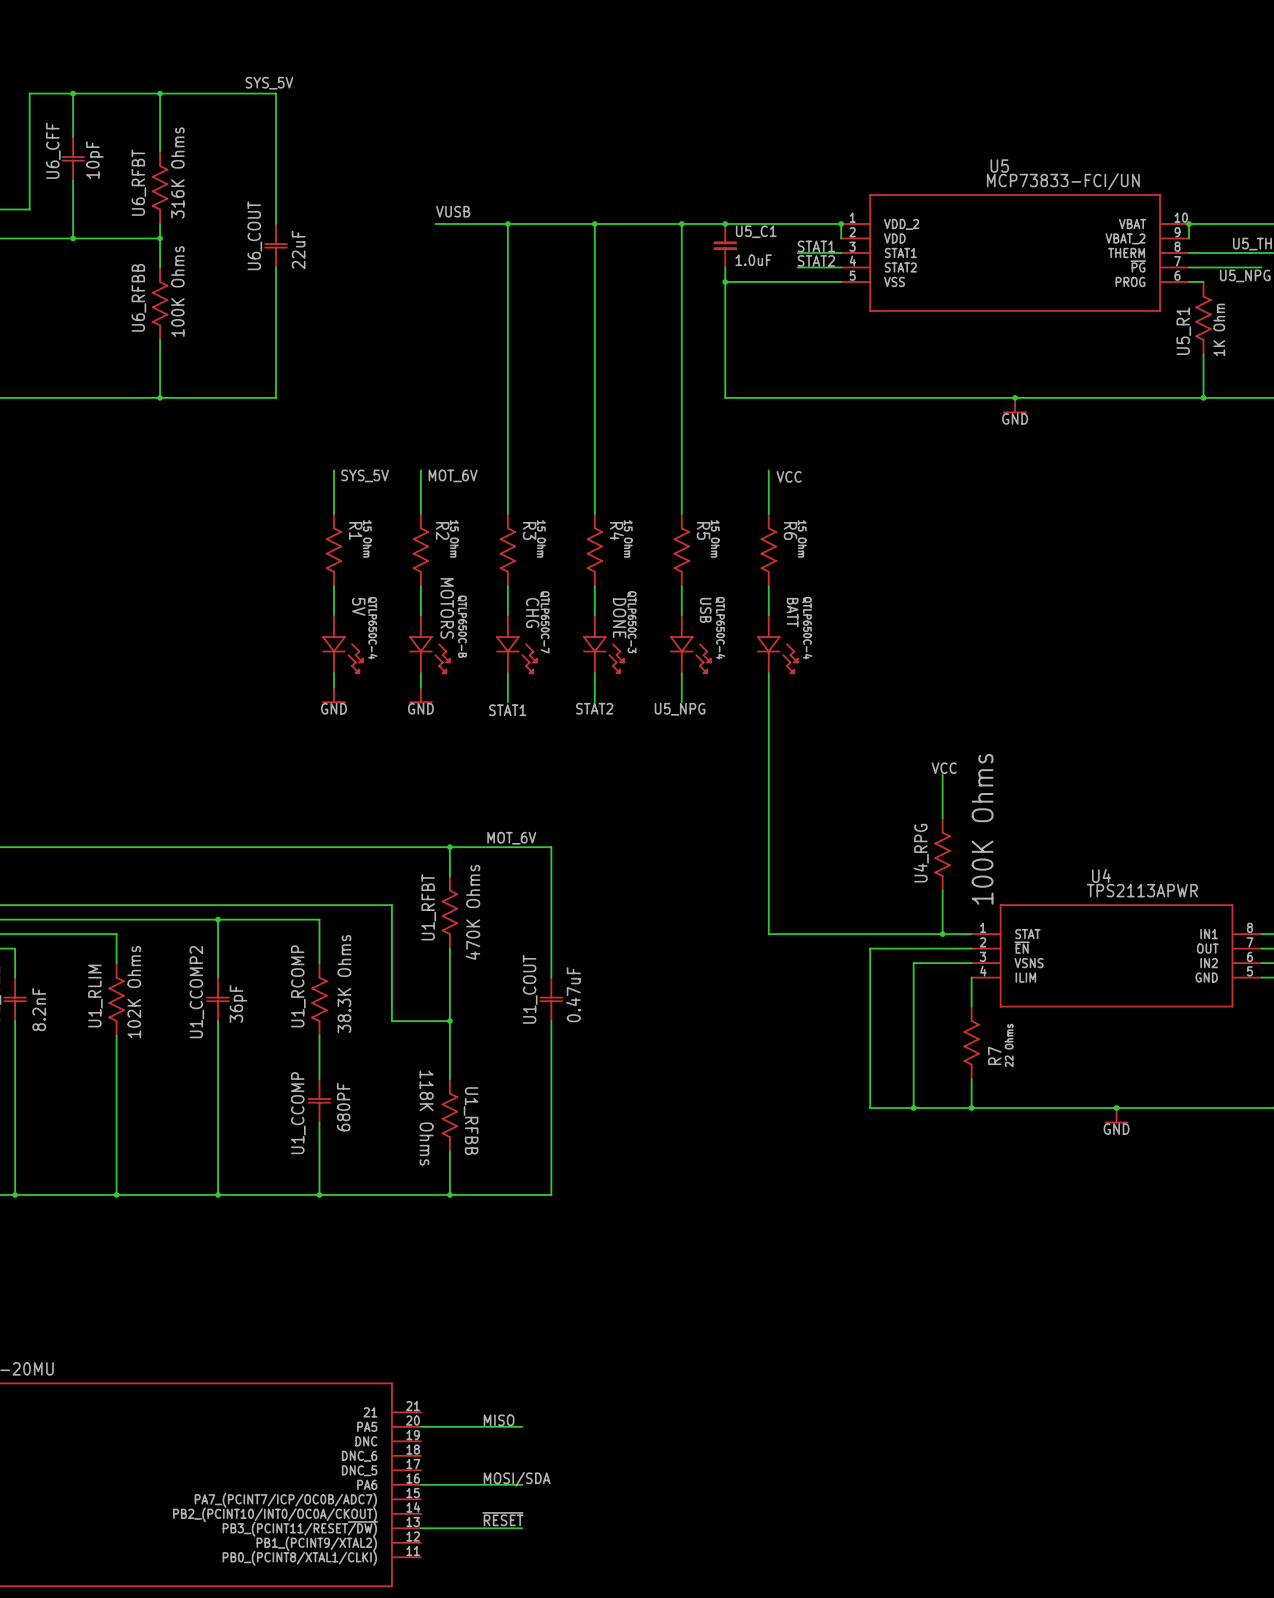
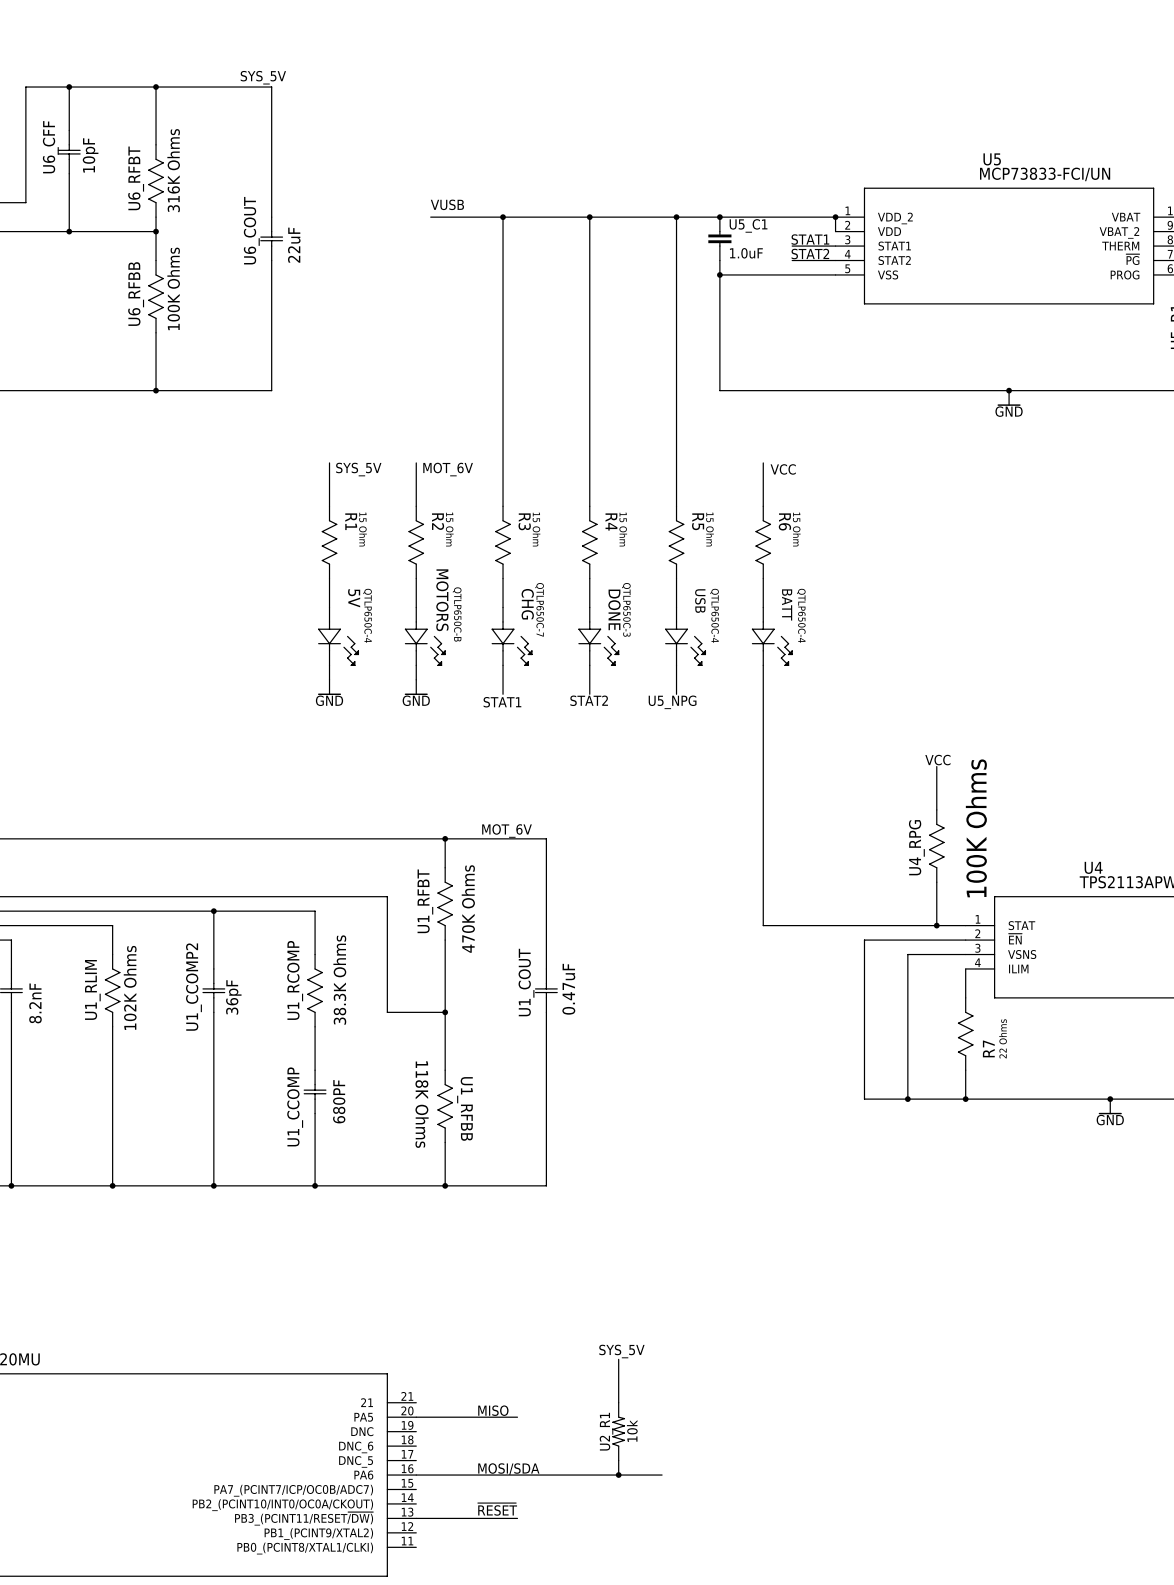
label: none -> SYS_5V (621, 1351)
wire: none -> (618, 1359) (618, 1402)
U2_R1: none -> 10k (618, 1431)
wire: none -> (618, 1460) (618, 1475)
wire: none -> (517, 1475) (662, 1475)
junction: none -> (618, 1475)

